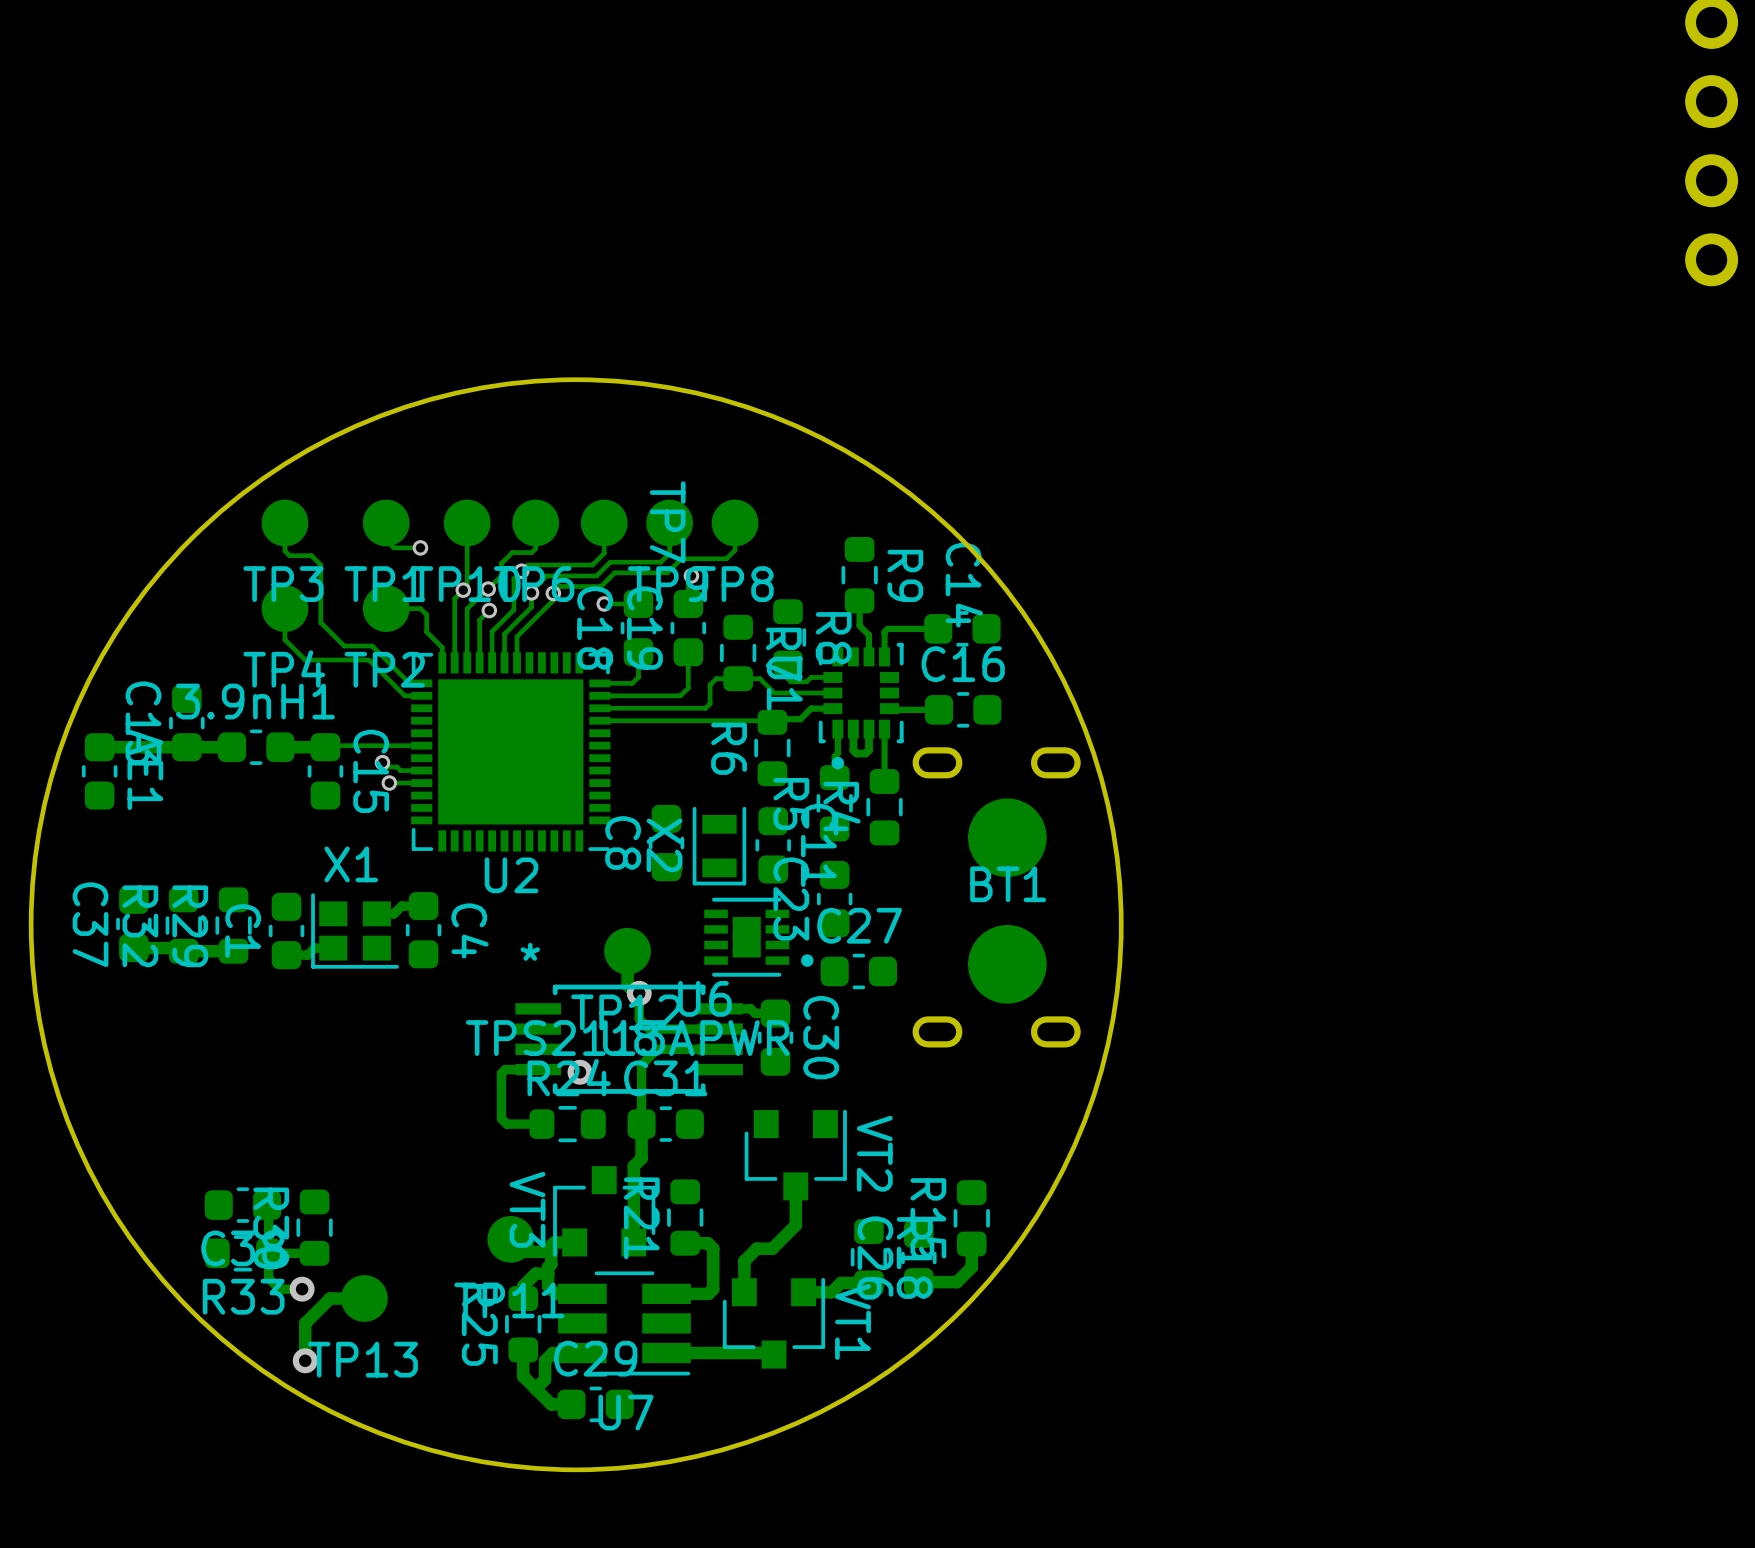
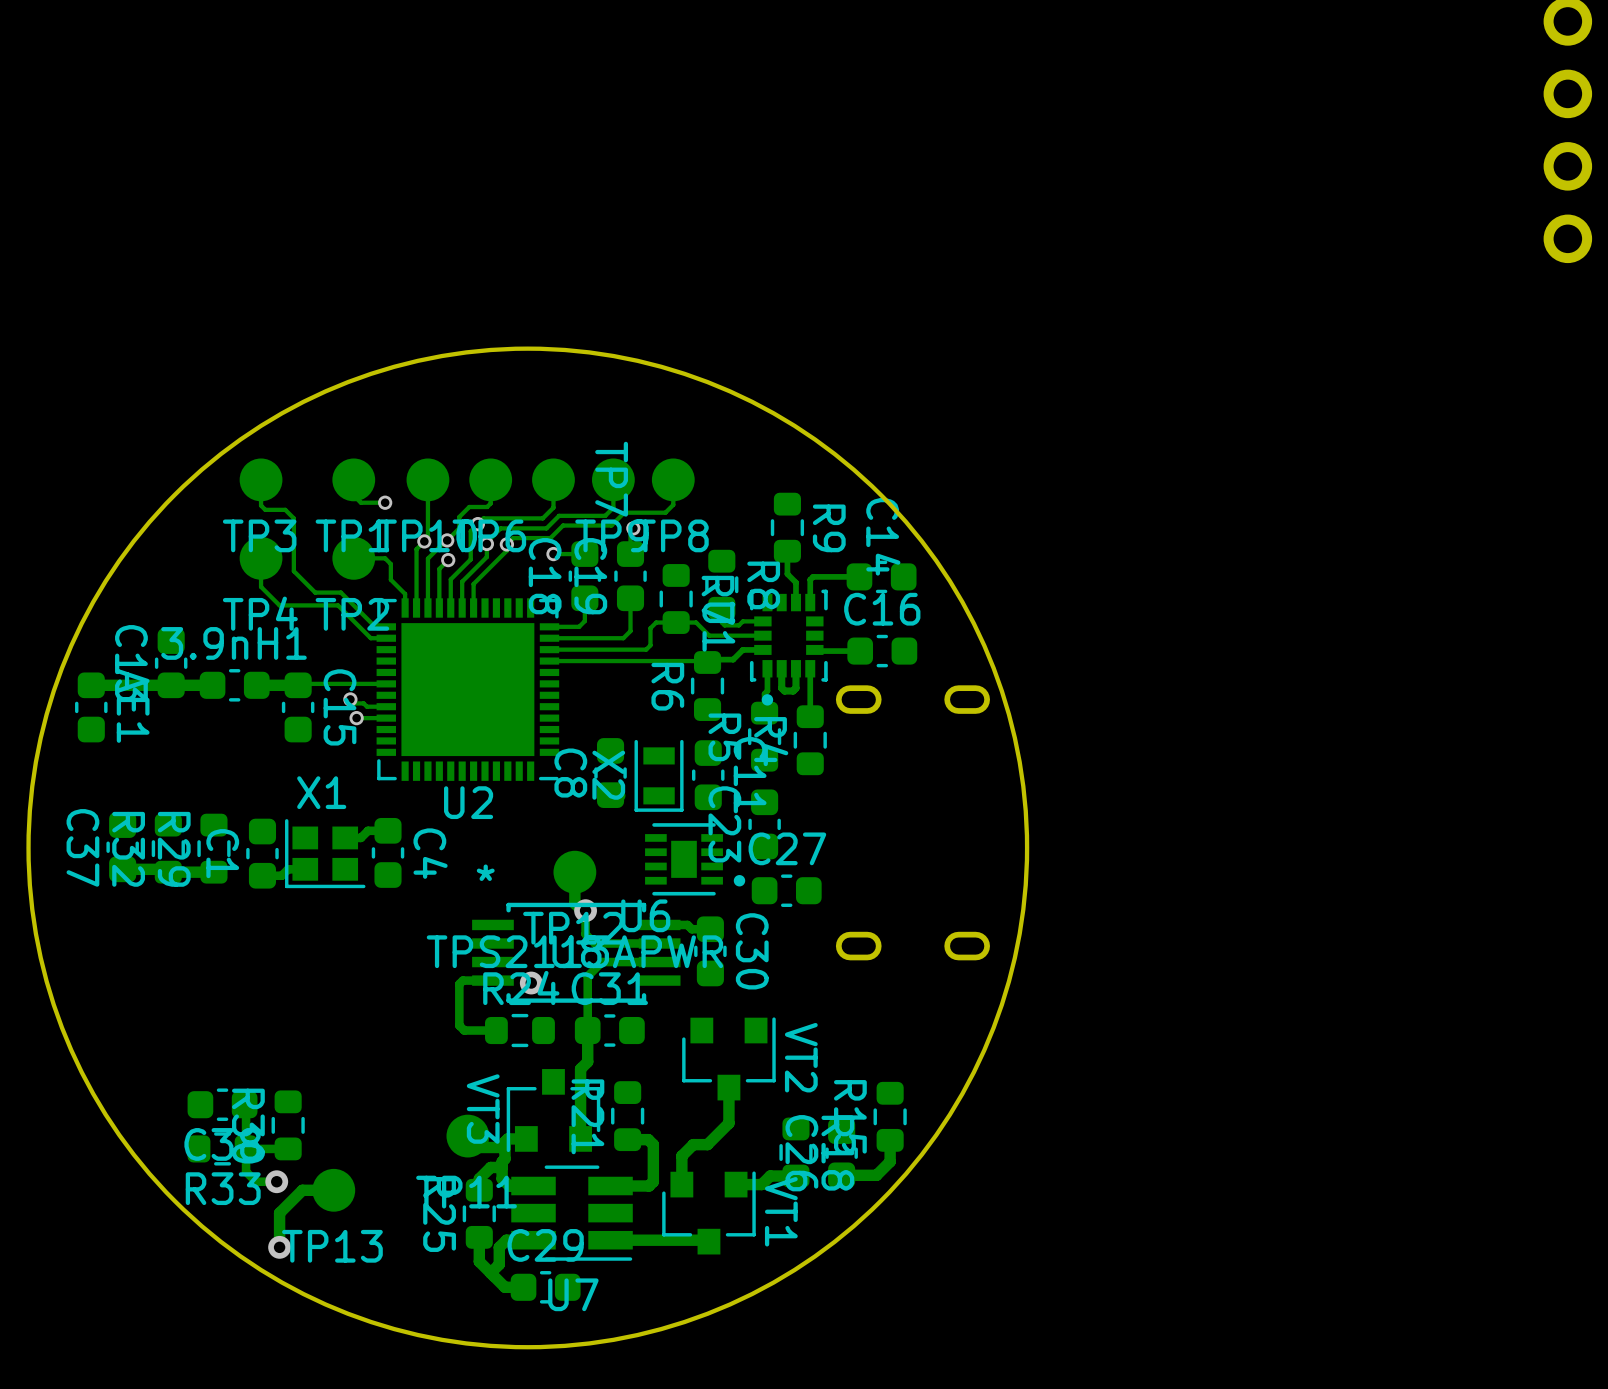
BT1: (1007, 901) -> none

